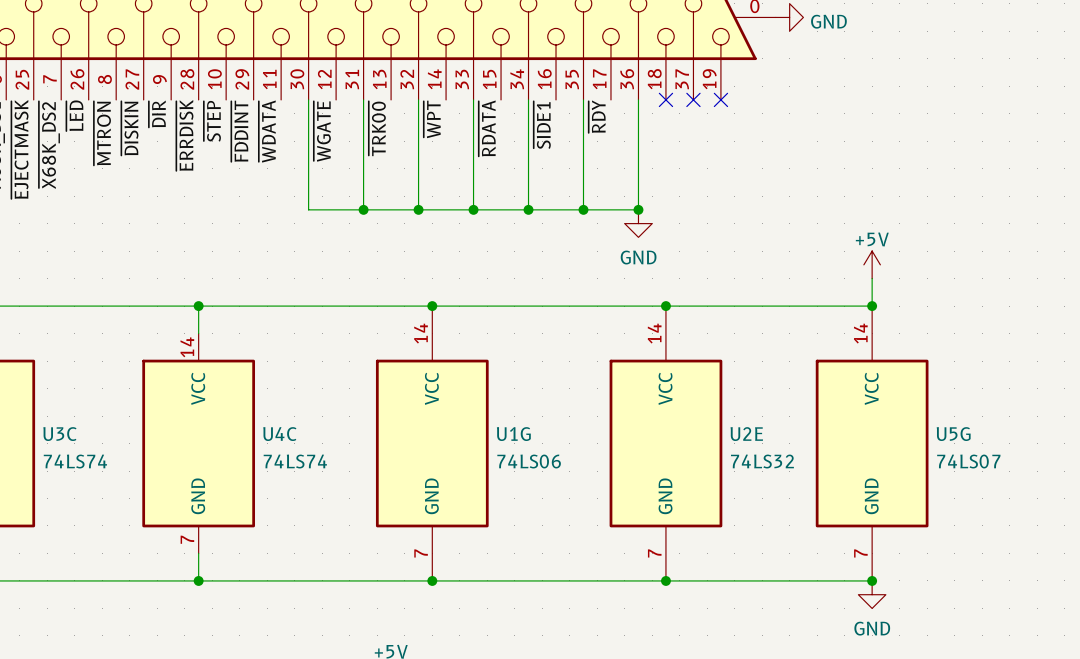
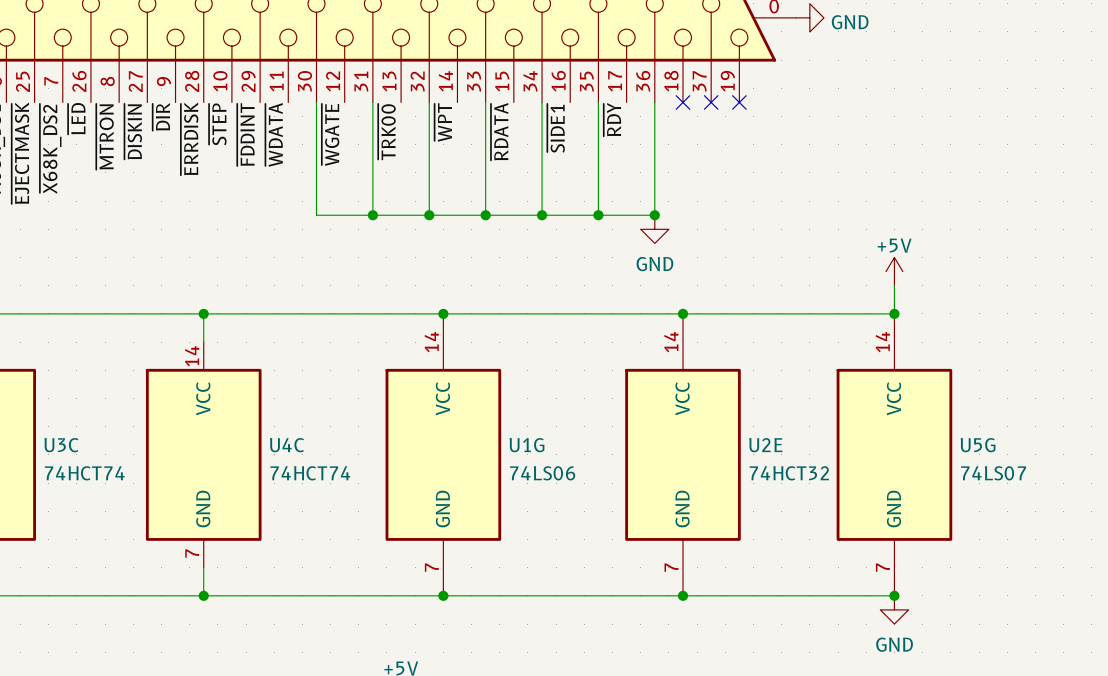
U3C value: 74LS74 (75, 461) -> 74HCT74 (84, 473)
U4C value: 74LS74 (295, 461) -> 74HCT74 (310, 473)
U2E value: 74LS32 (762, 461) -> 74HCT32 (789, 473)

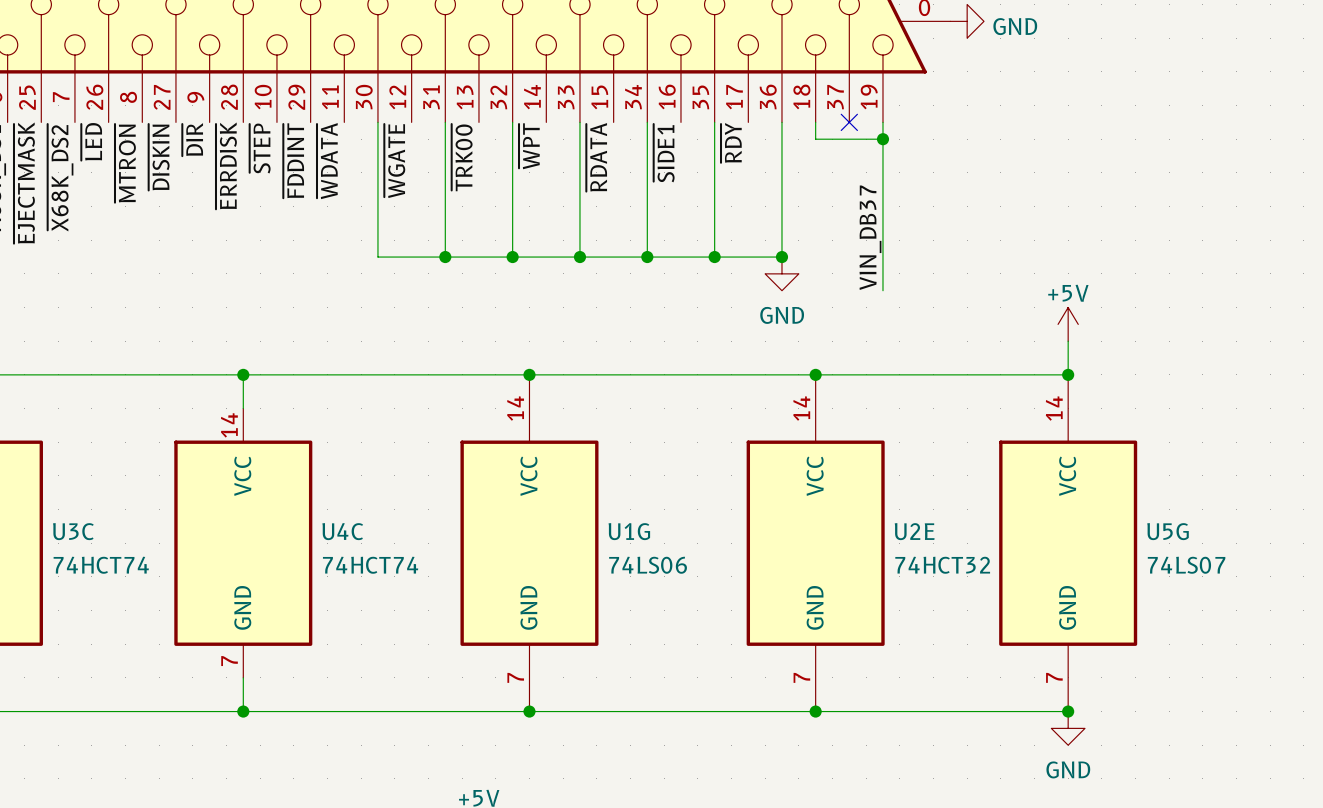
wire: none -> (815, 122) (815, 139) (882, 139)
no-connect mark: (682, 102) -> none
wire: none -> (882, 122) (882, 290)
no-connect mark: (739, 102) -> none
junction: none -> (882, 139)
label: none -> VIN_DB37 (870, 237)

